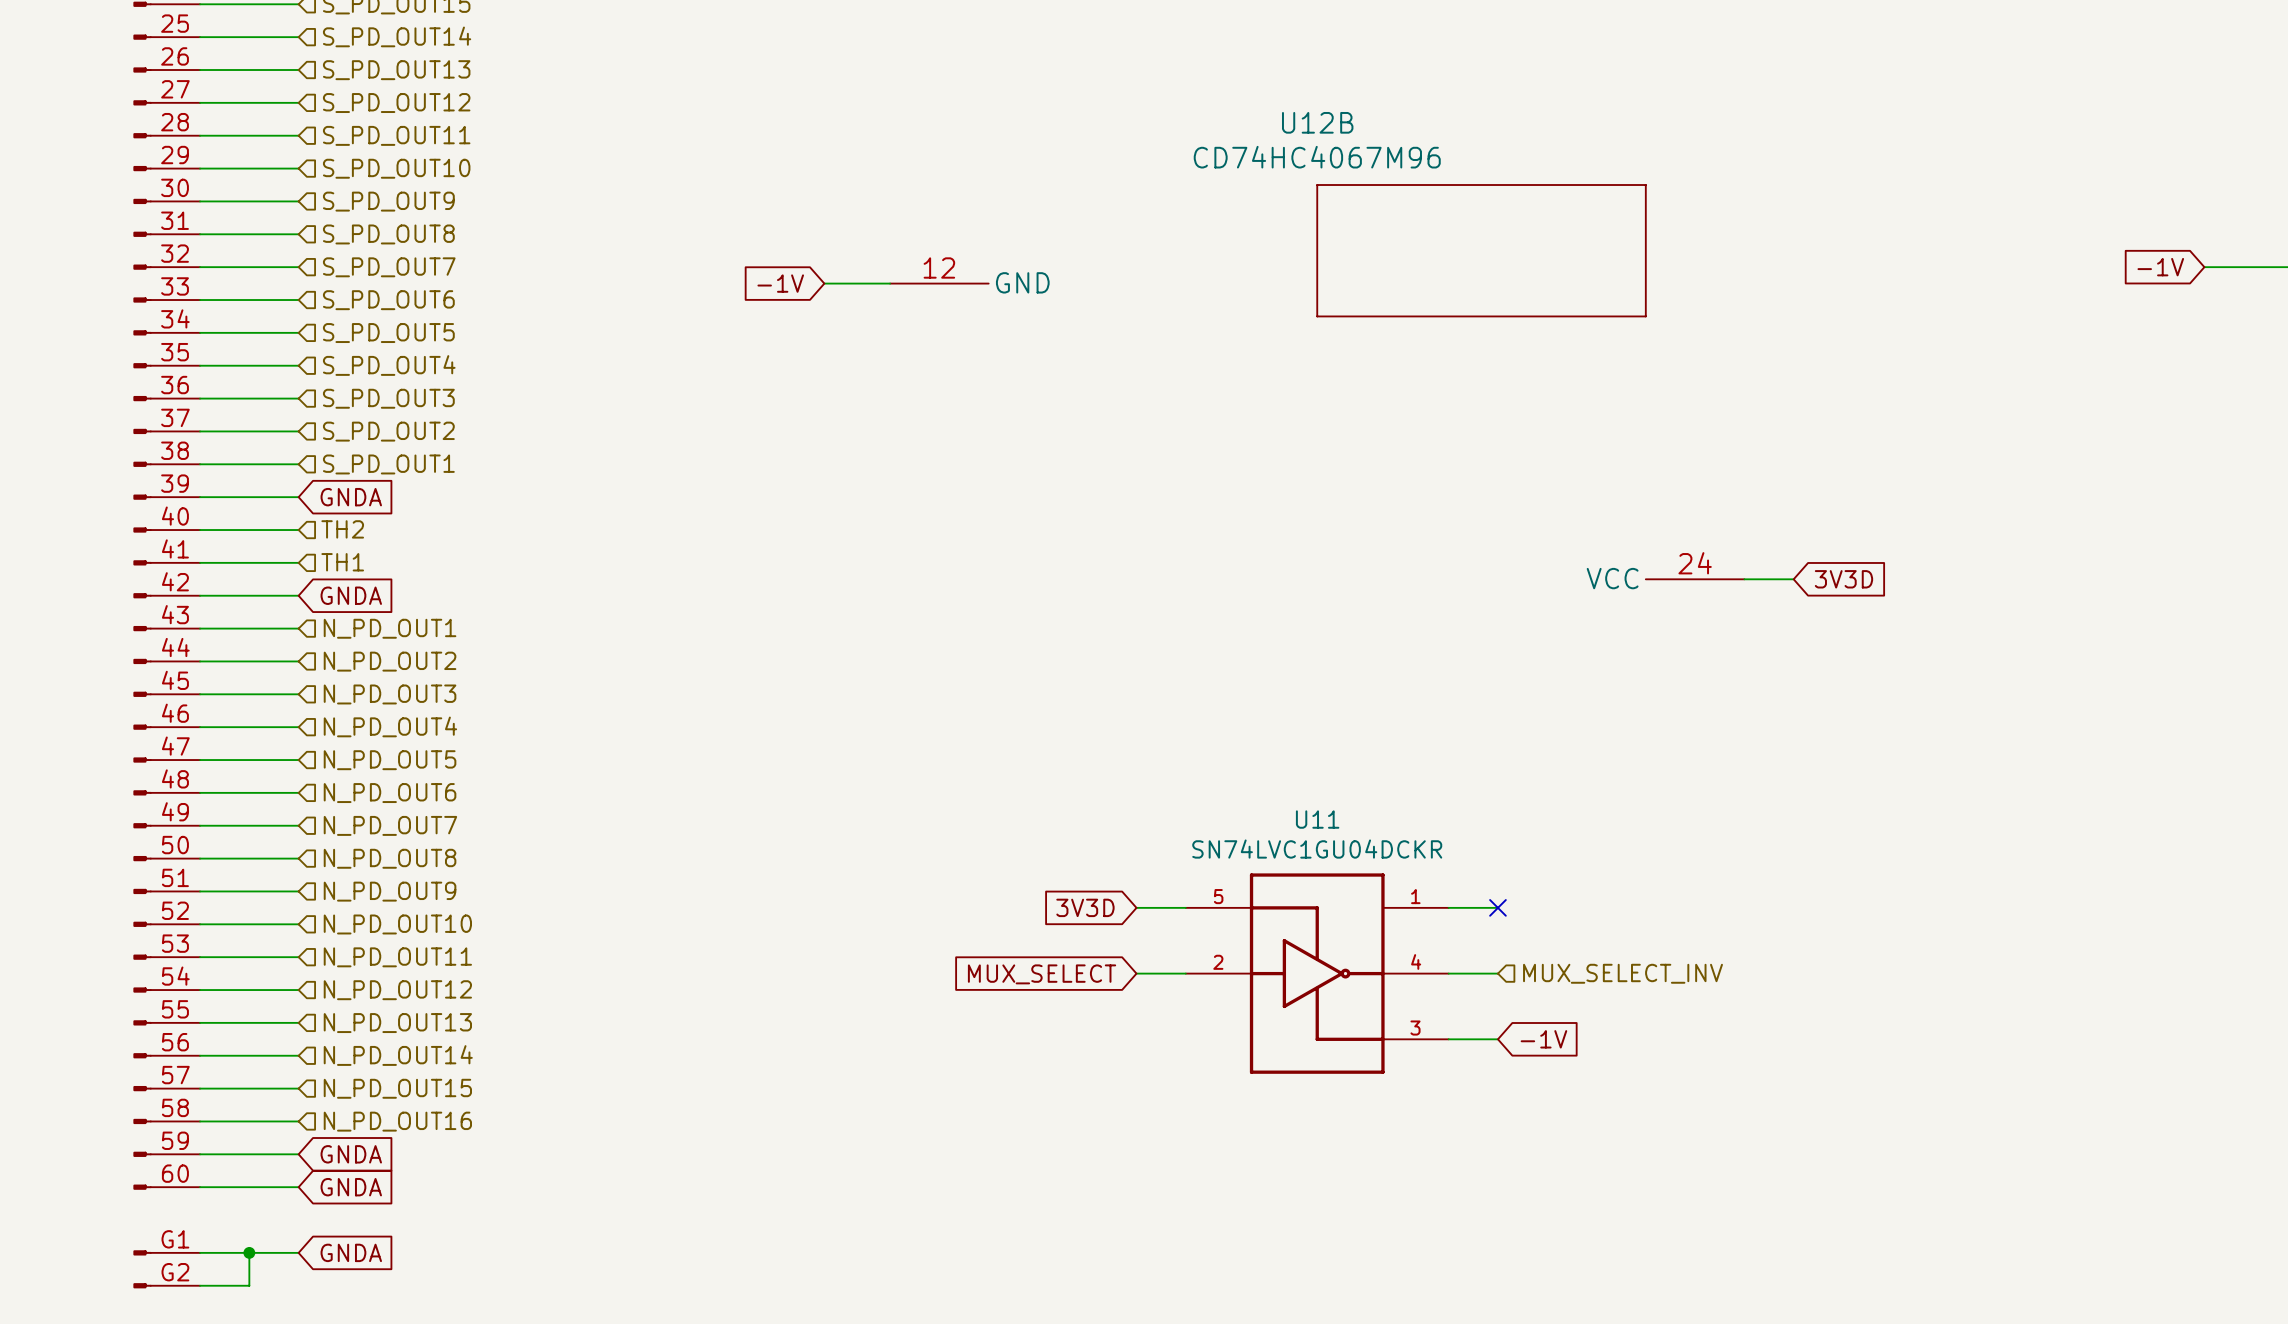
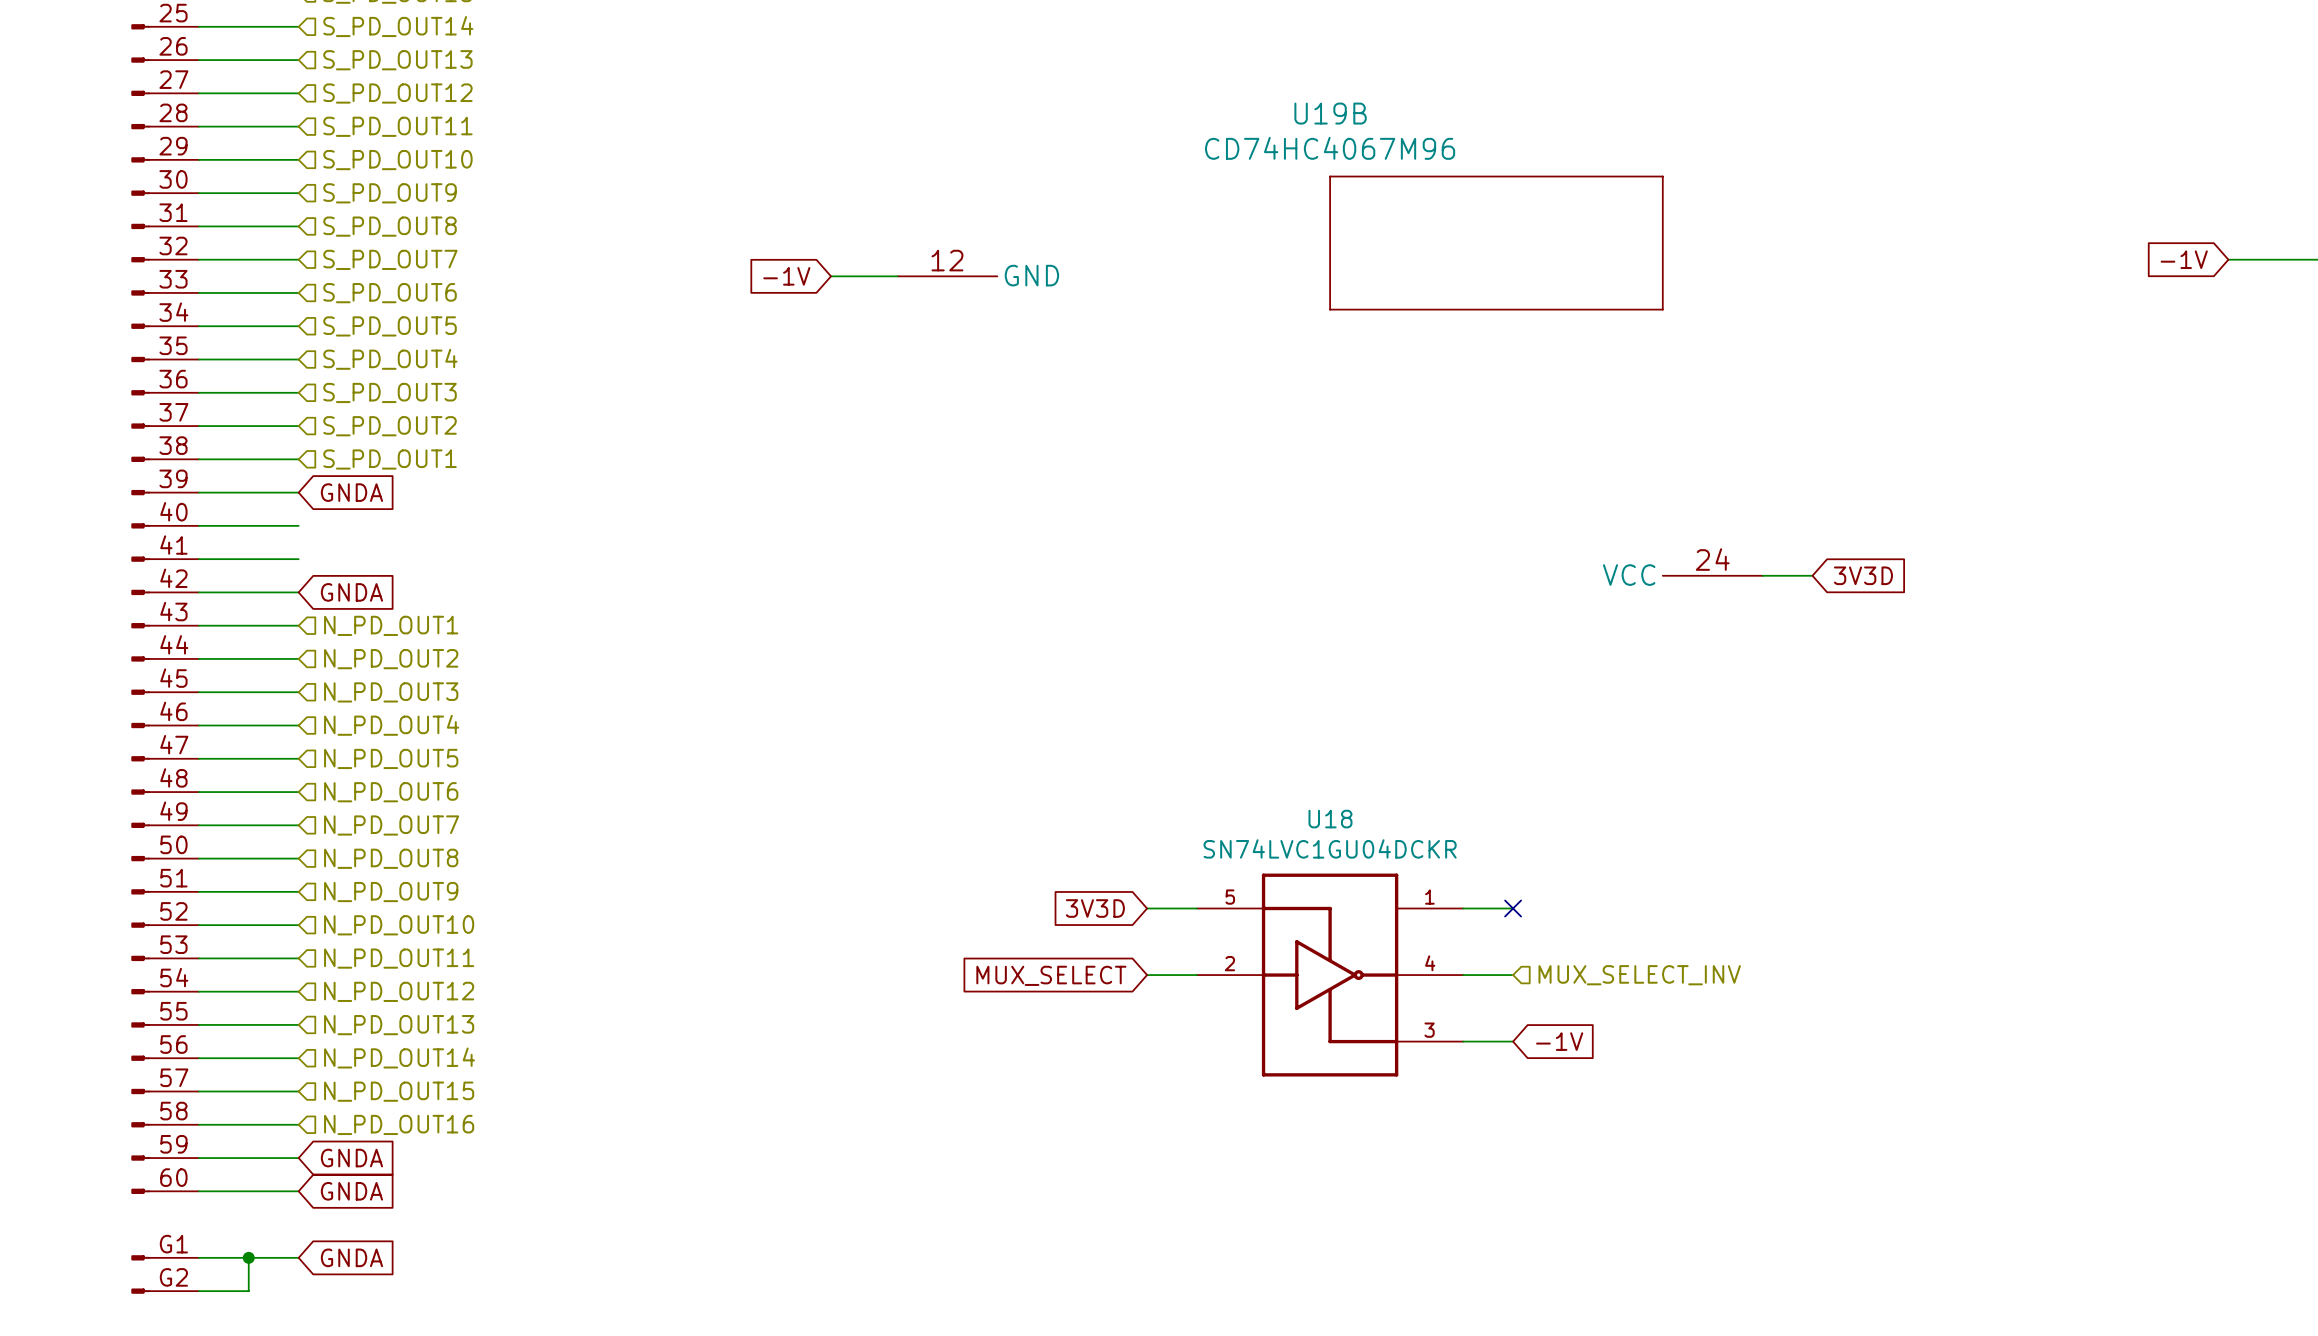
U12B name: U12B (1317, 122) -> U19B (1330, 113)
hierarchical label: TH2 (342, 529) -> none
hierarchical label: TH1 (342, 562) -> none
U11 name: U11 (1317, 819) -> U18 (1330, 819)

